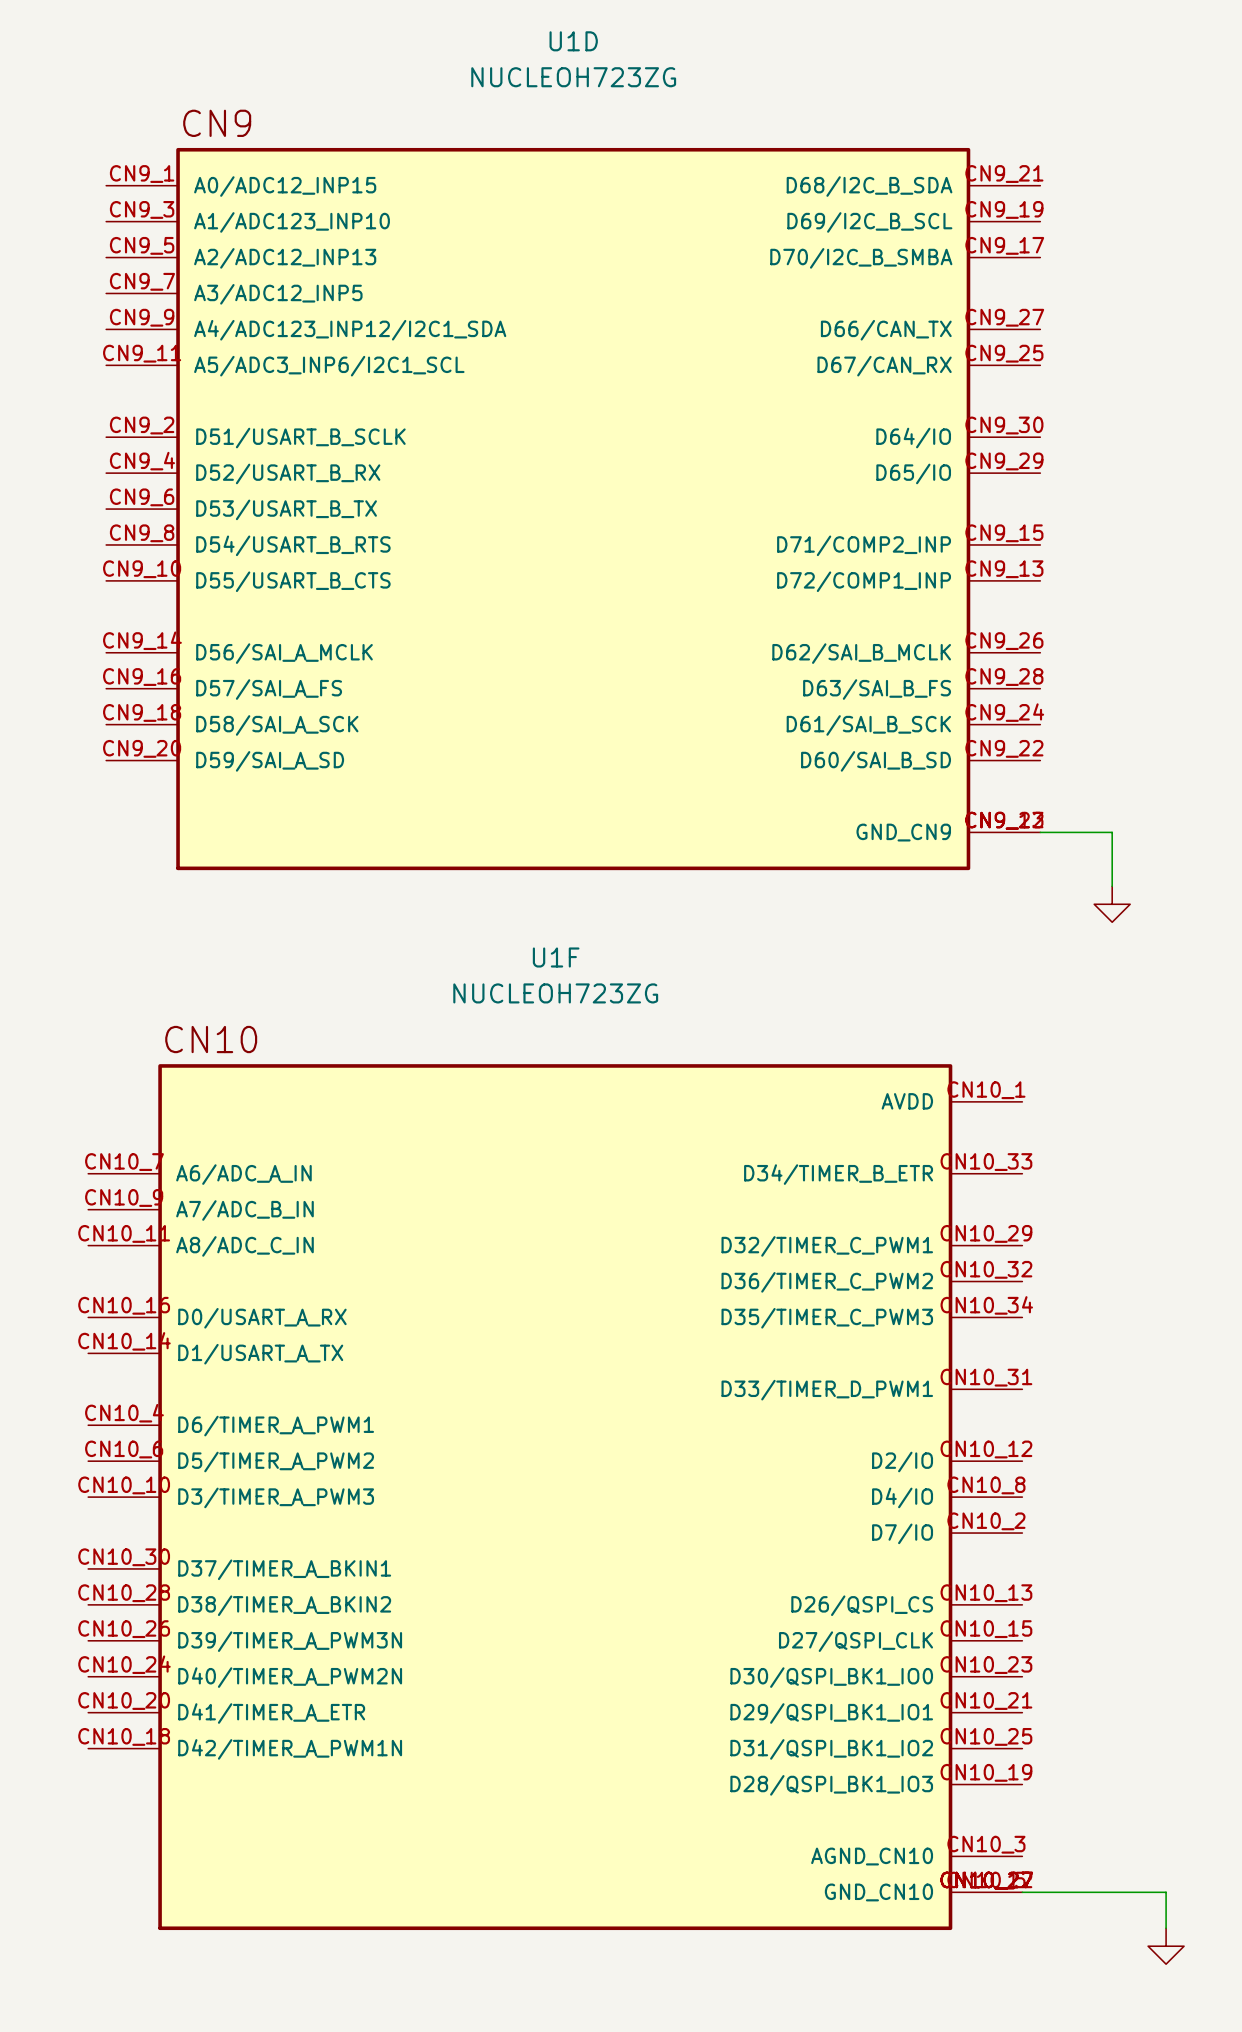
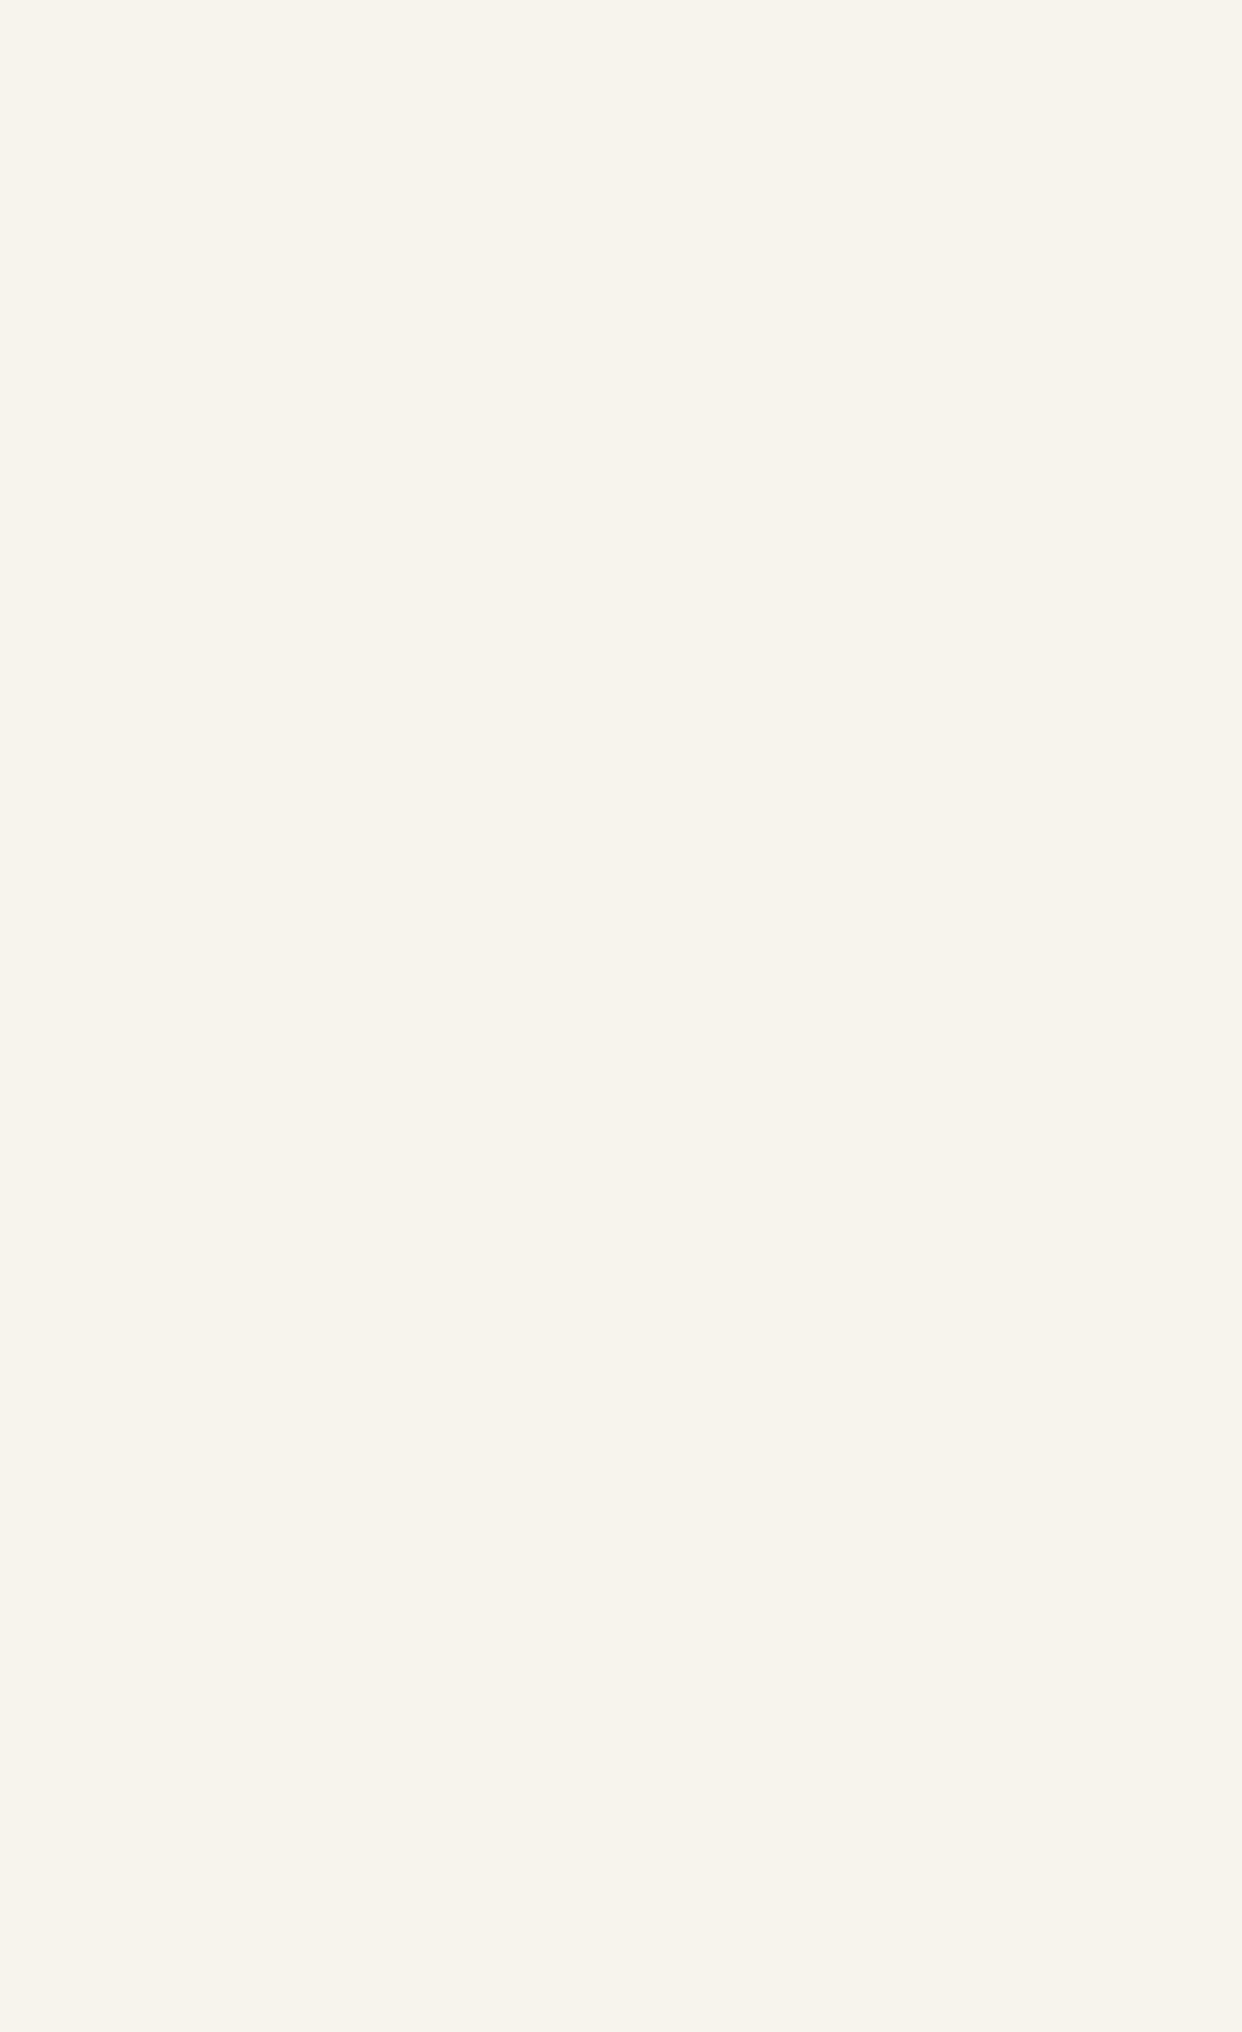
U1D: NUCLEOH723ZG (573, 509) -> none
wire: (1040, 832) (1112, 832) (1112, 886) -> none
power symbol: (1112, 904) -> none
U1F: NUCLEOH723ZG (555, 1497) -> none
wire: (1022, 1892) (1166, 1892) (1166, 1928) -> none
power symbol: (1166, 1946) -> none

